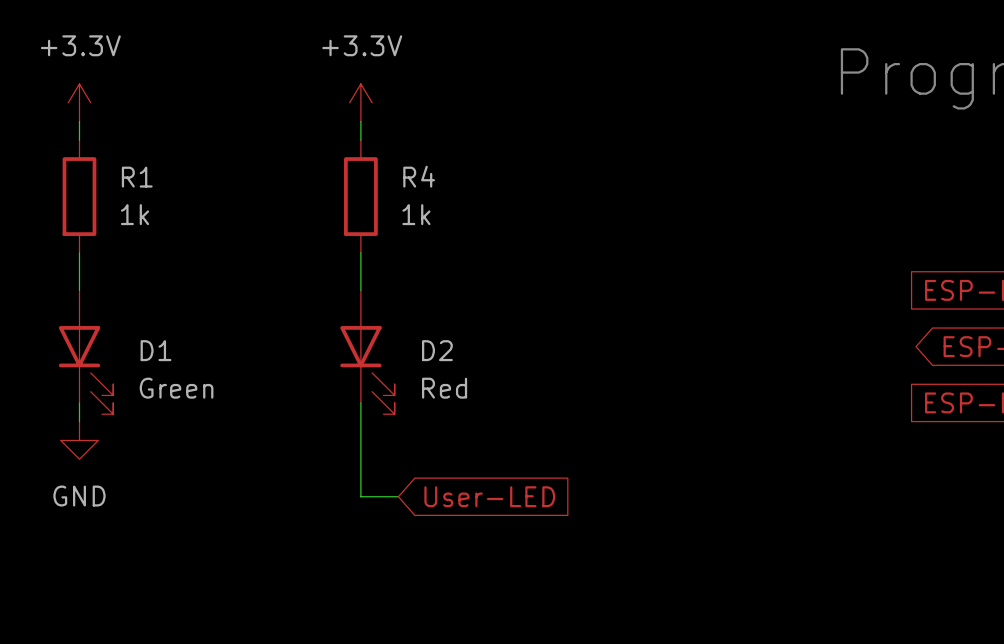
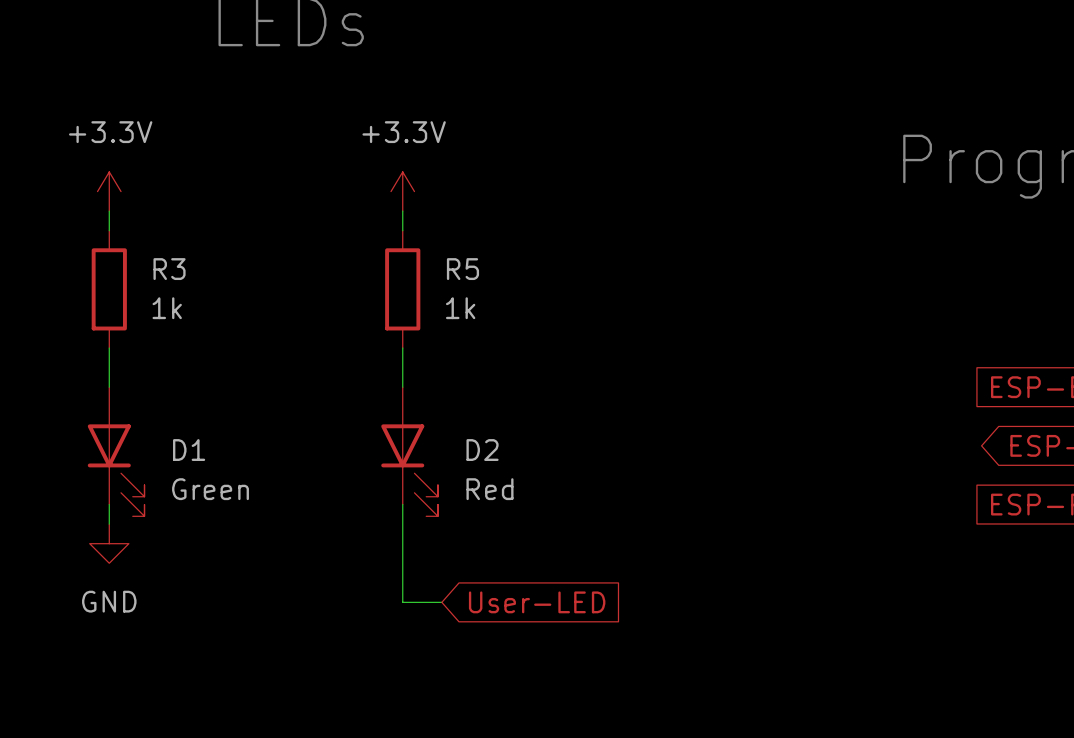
R4 name: R4 (419, 176) -> R5 (462, 269)
R1 name: R1 (137, 177) -> R3 (169, 269)

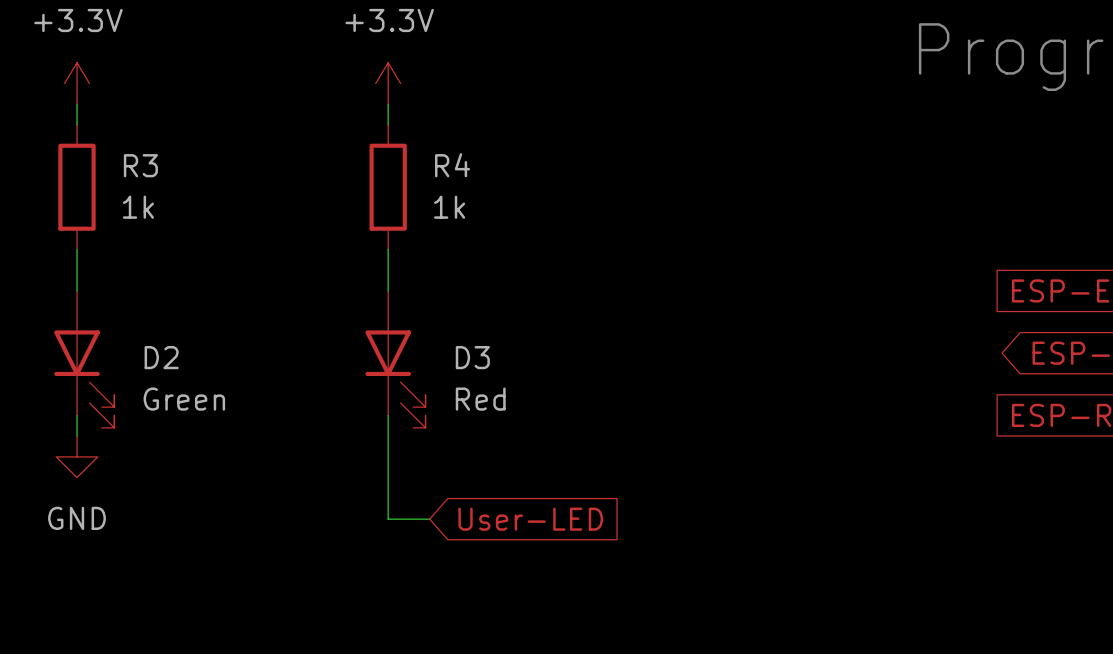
R5 name: R5 (462, 269) -> R4 (452, 165)
D1 name: D1 (189, 450) -> D2 (161, 357)
D2 name: D2 (482, 450) -> D3 (472, 357)

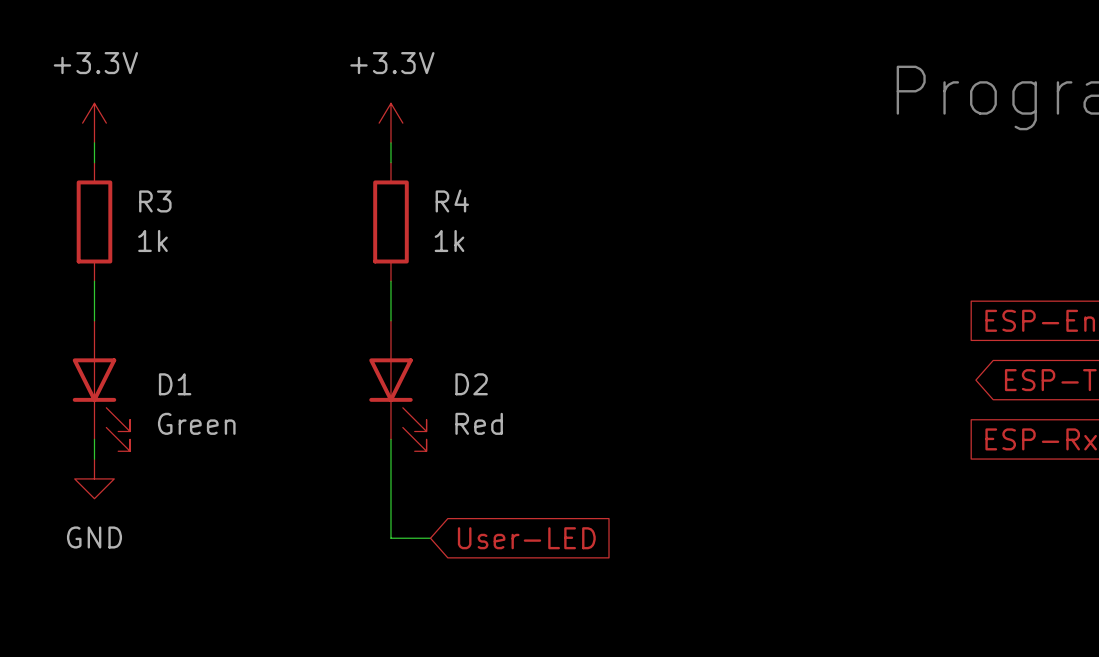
D2 name: D2 (161, 357) -> D1 (175, 384)
D3 name: D3 (472, 357) -> D2 (471, 384)

